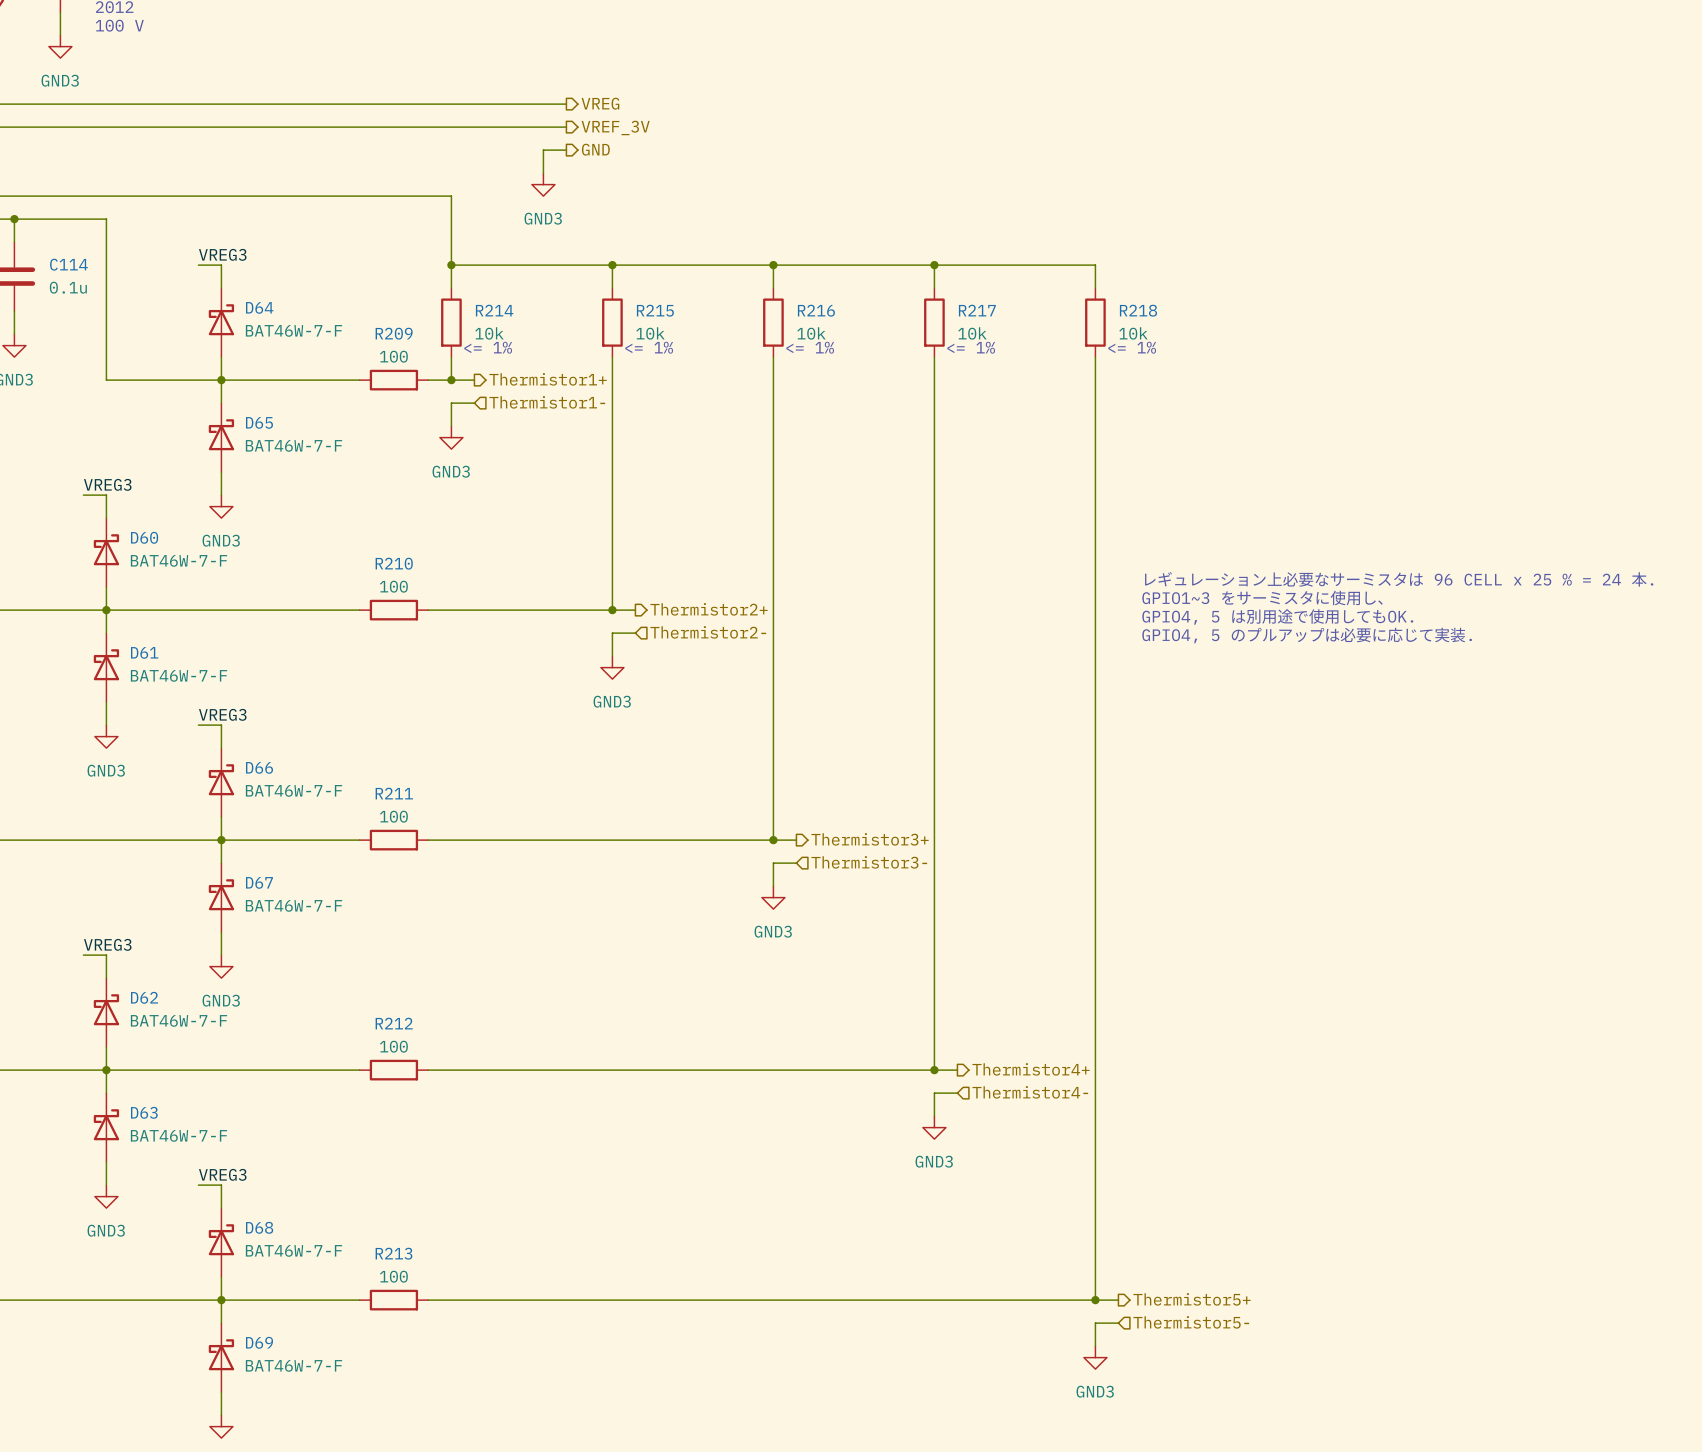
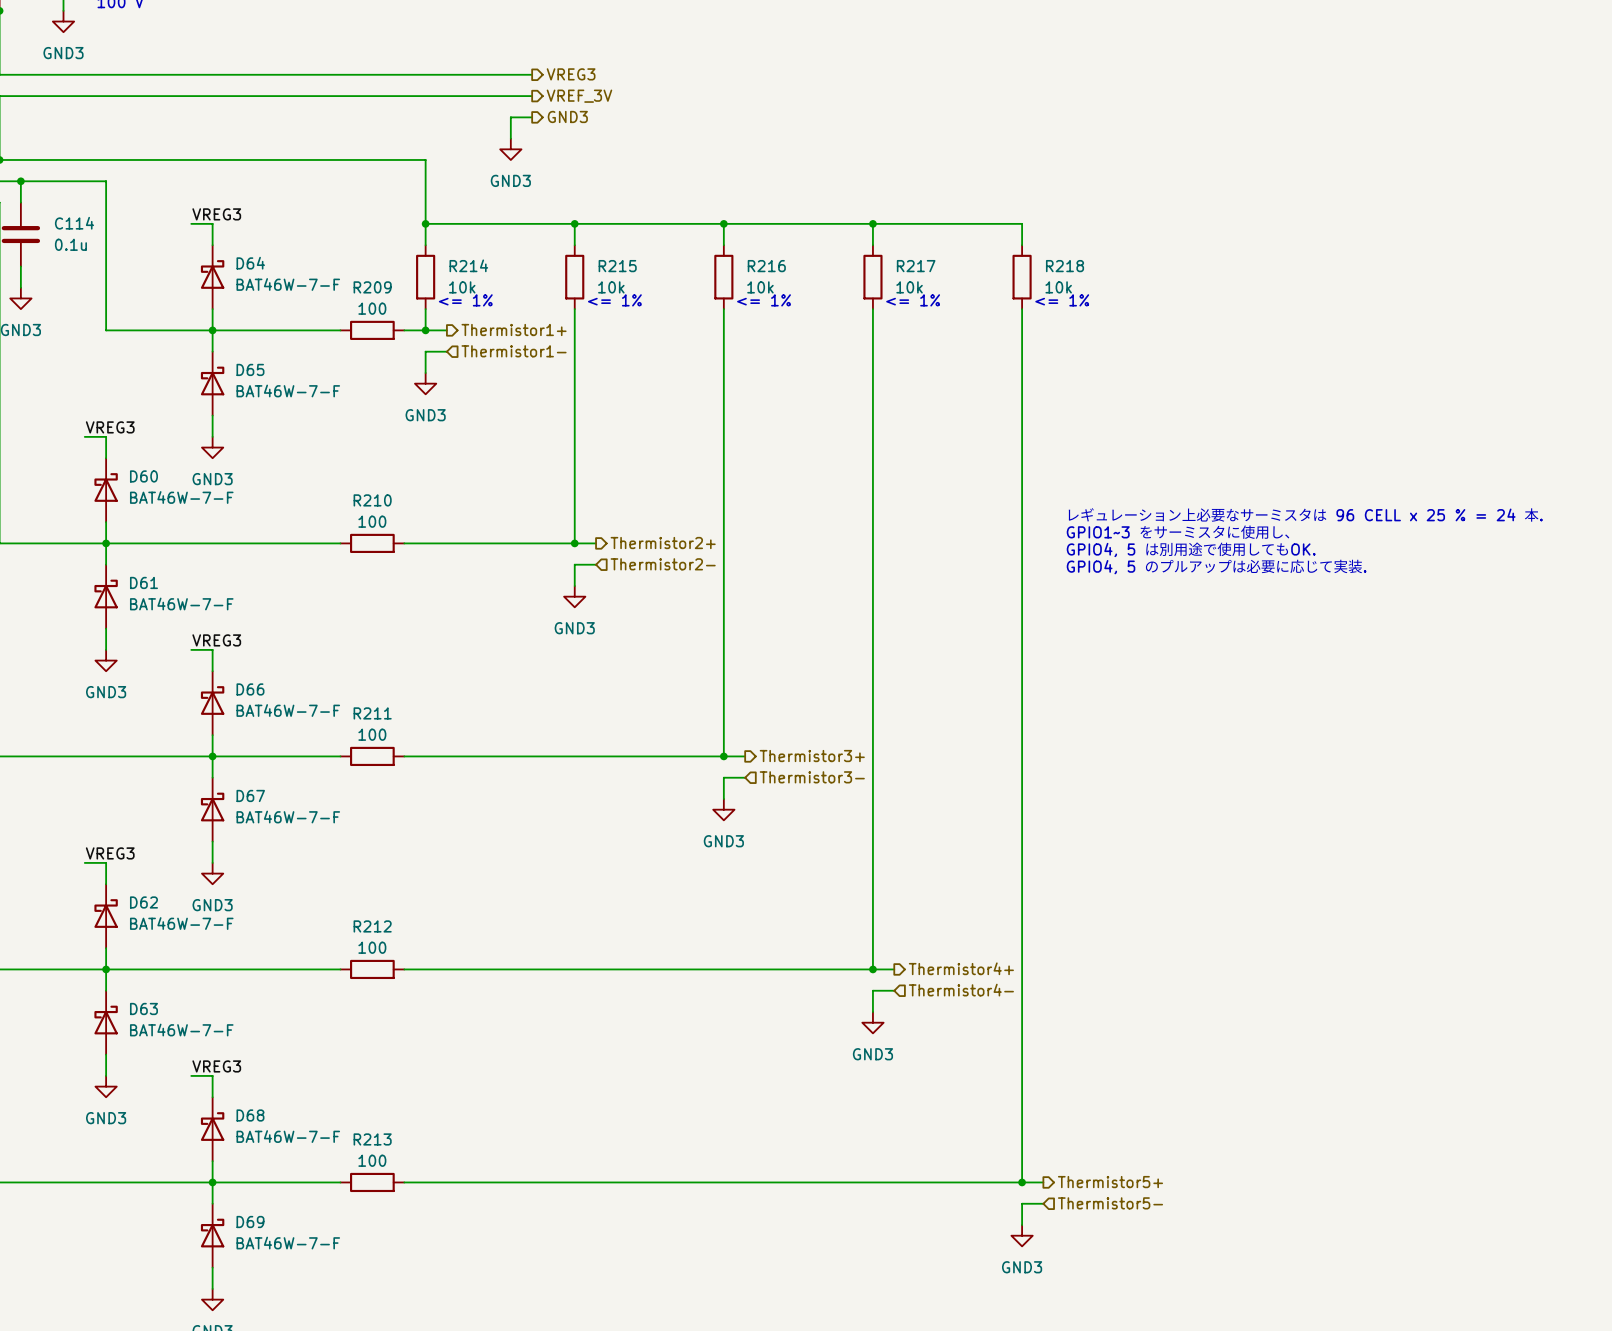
hierarchical label: VREG (600, 103) -> VREG3 (571, 74)
hierarchical label: GND (595, 149) -> GND3 (567, 116)

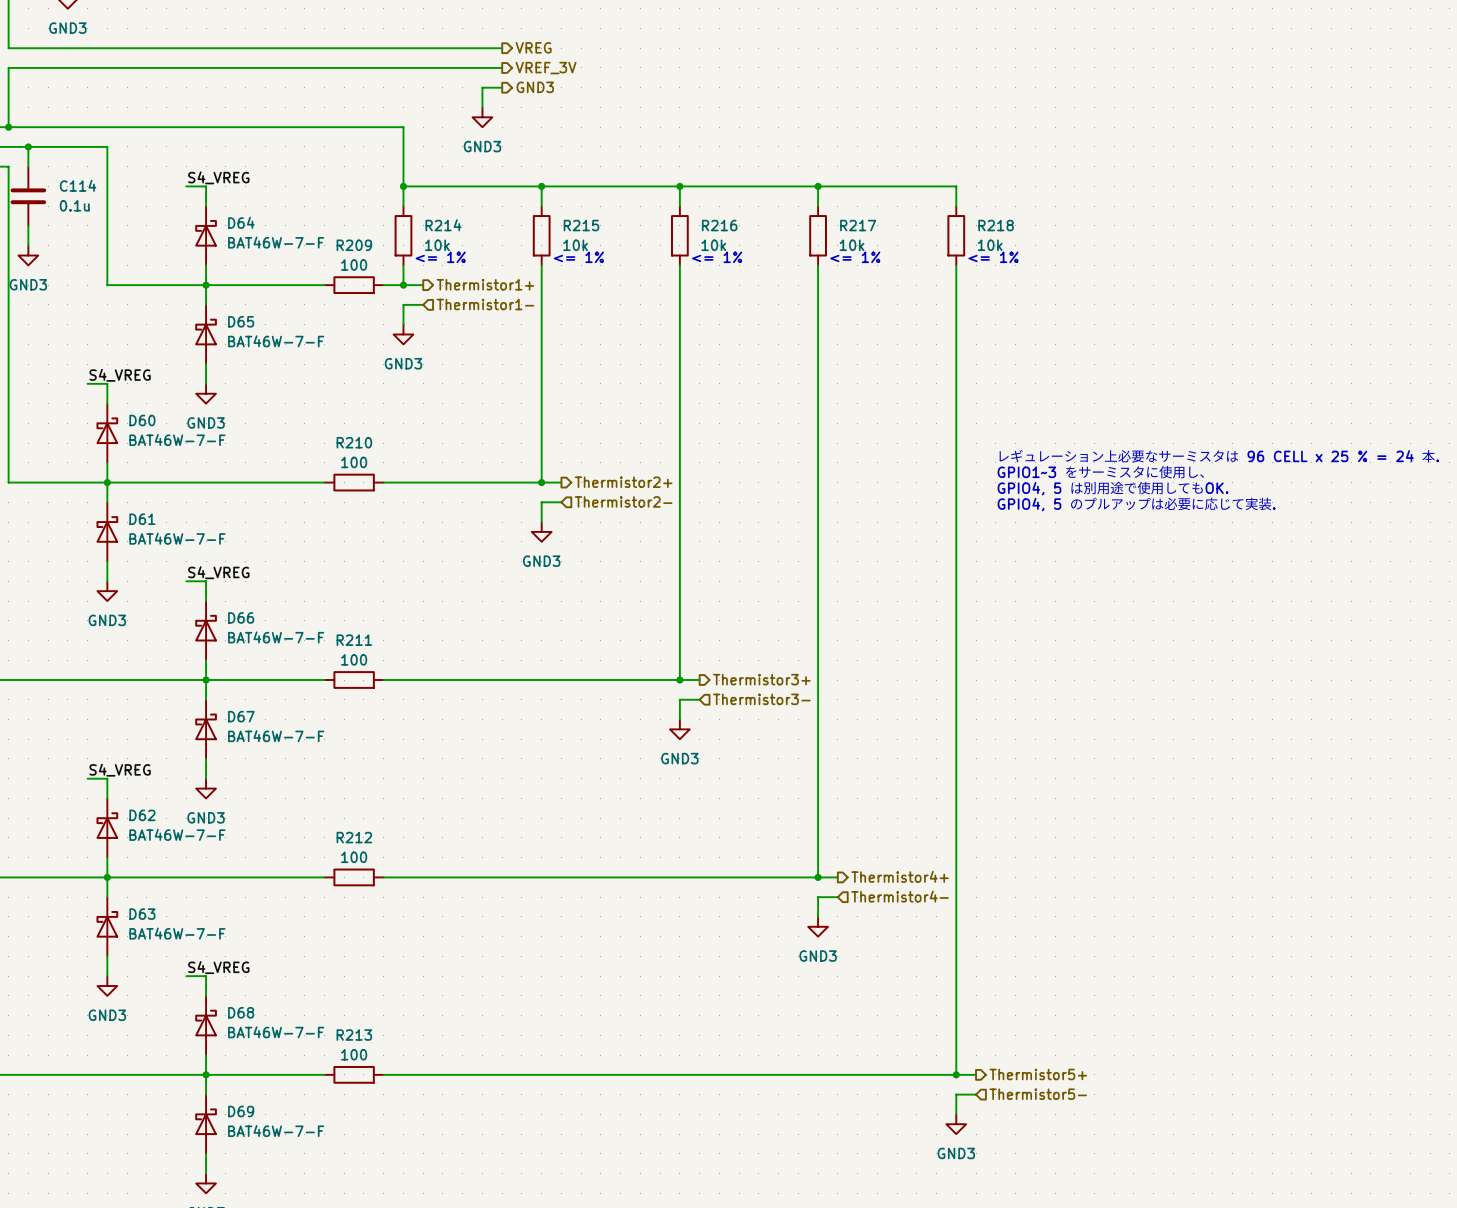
hierarchical label: VREG3 (571, 74) -> VREG (533, 47)
label: VREG3 (216, 214) -> S4_VREG (218, 177)
label: VREG3 (110, 427) -> S4_VREG (120, 375)
label: VREG3 (216, 640) -> S4_VREG (218, 572)
label: VREG3 (110, 853) -> S4_VREG (120, 770)
label: VREG3 (216, 1066) -> S4_VREG (218, 967)

